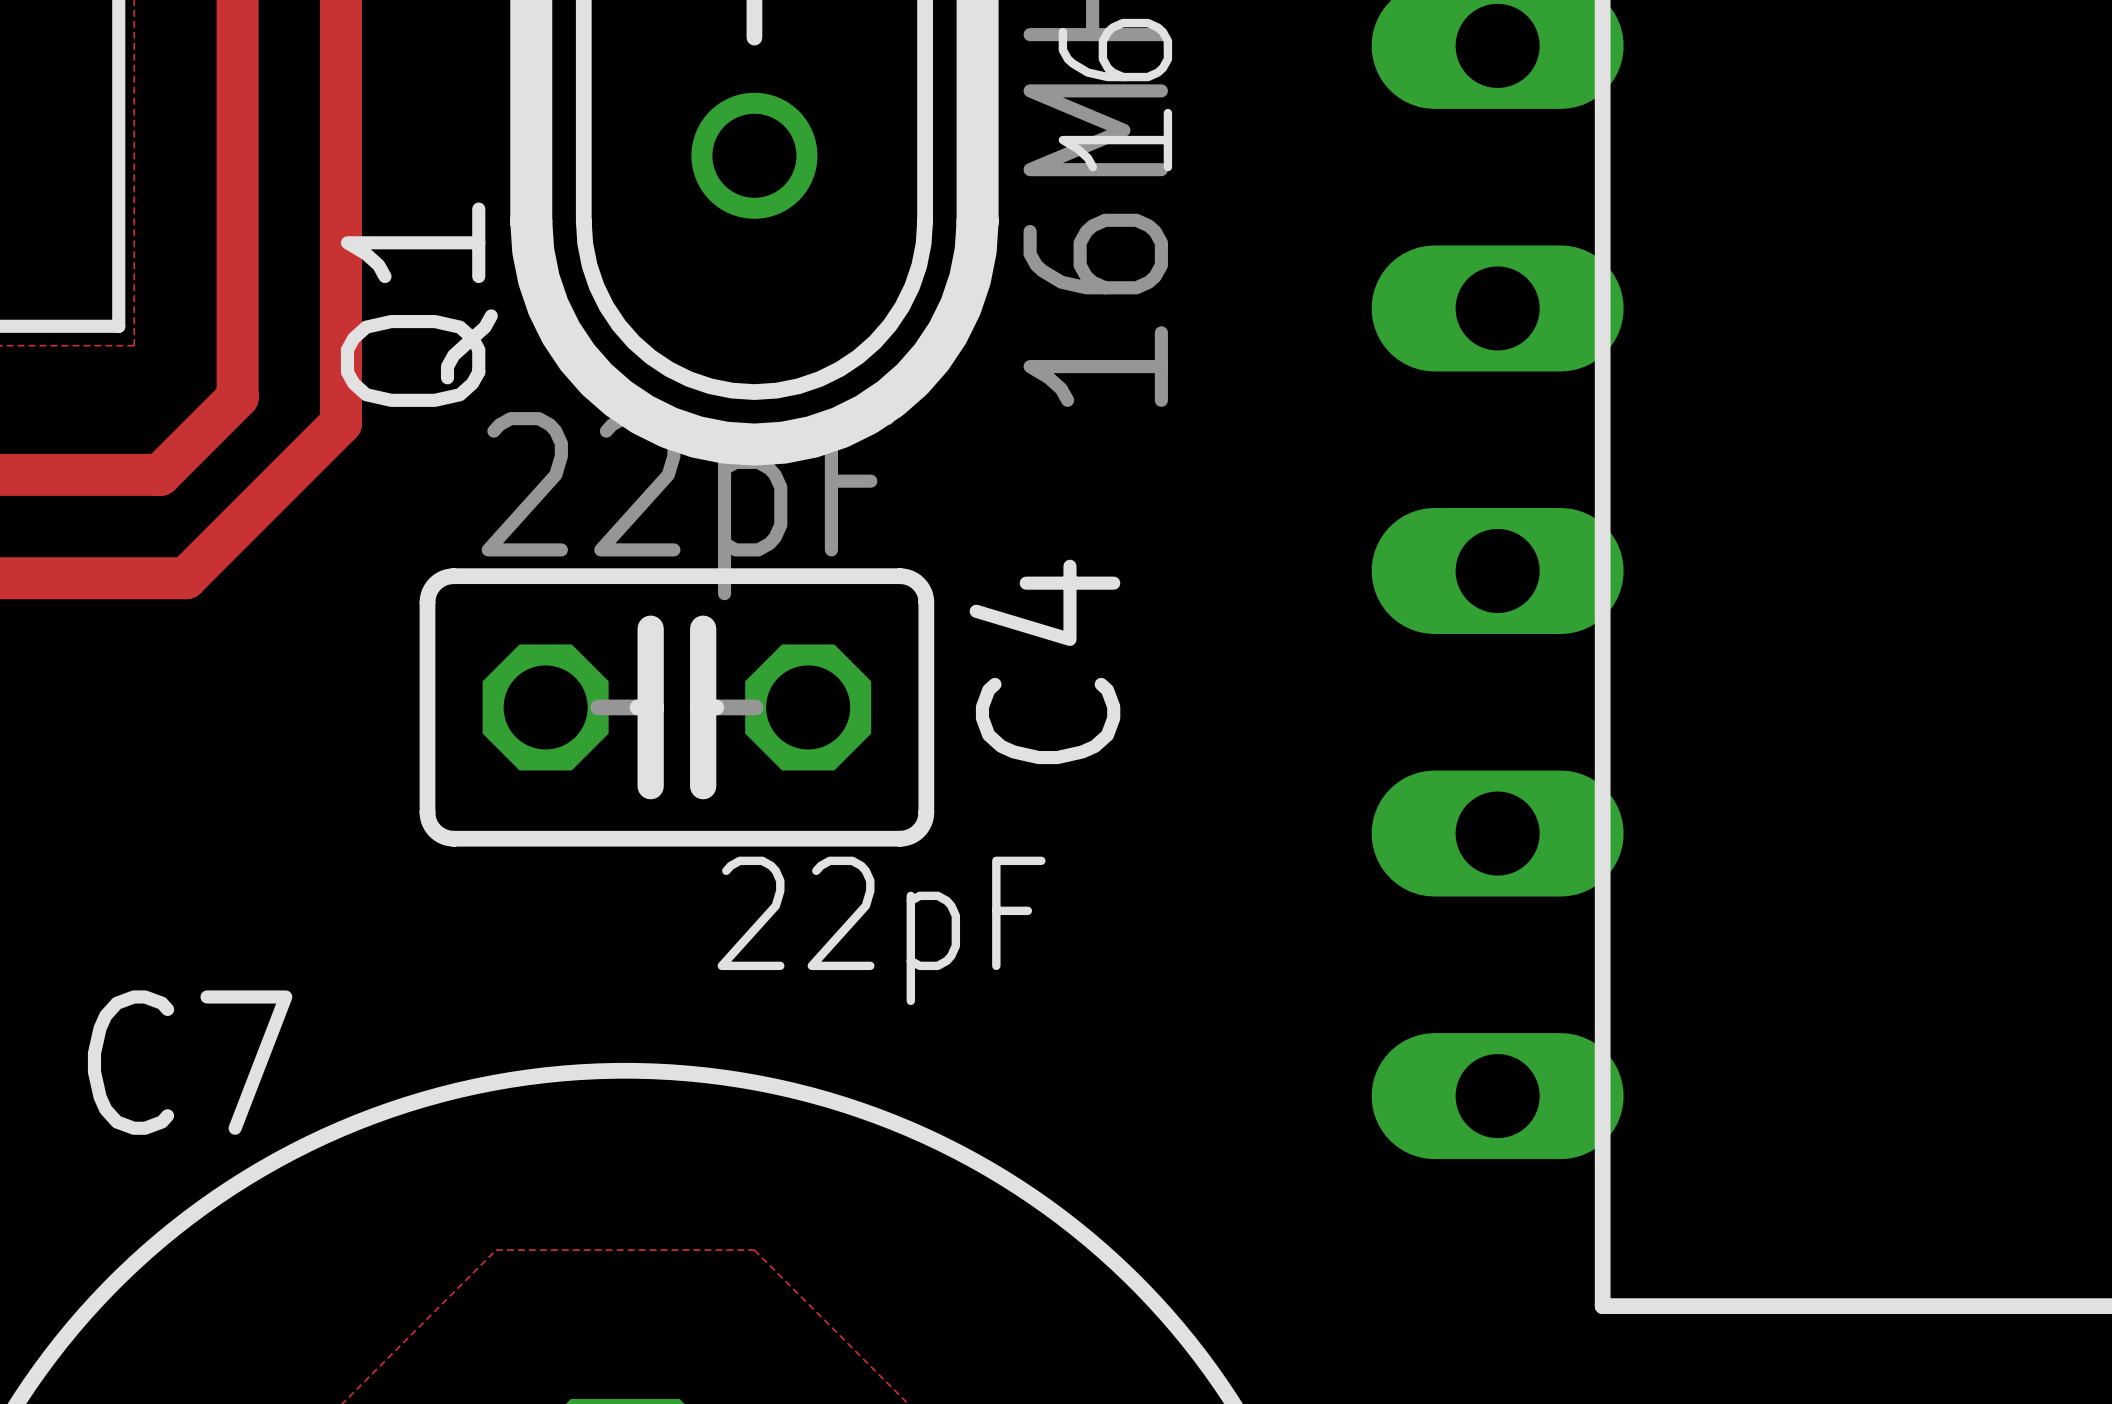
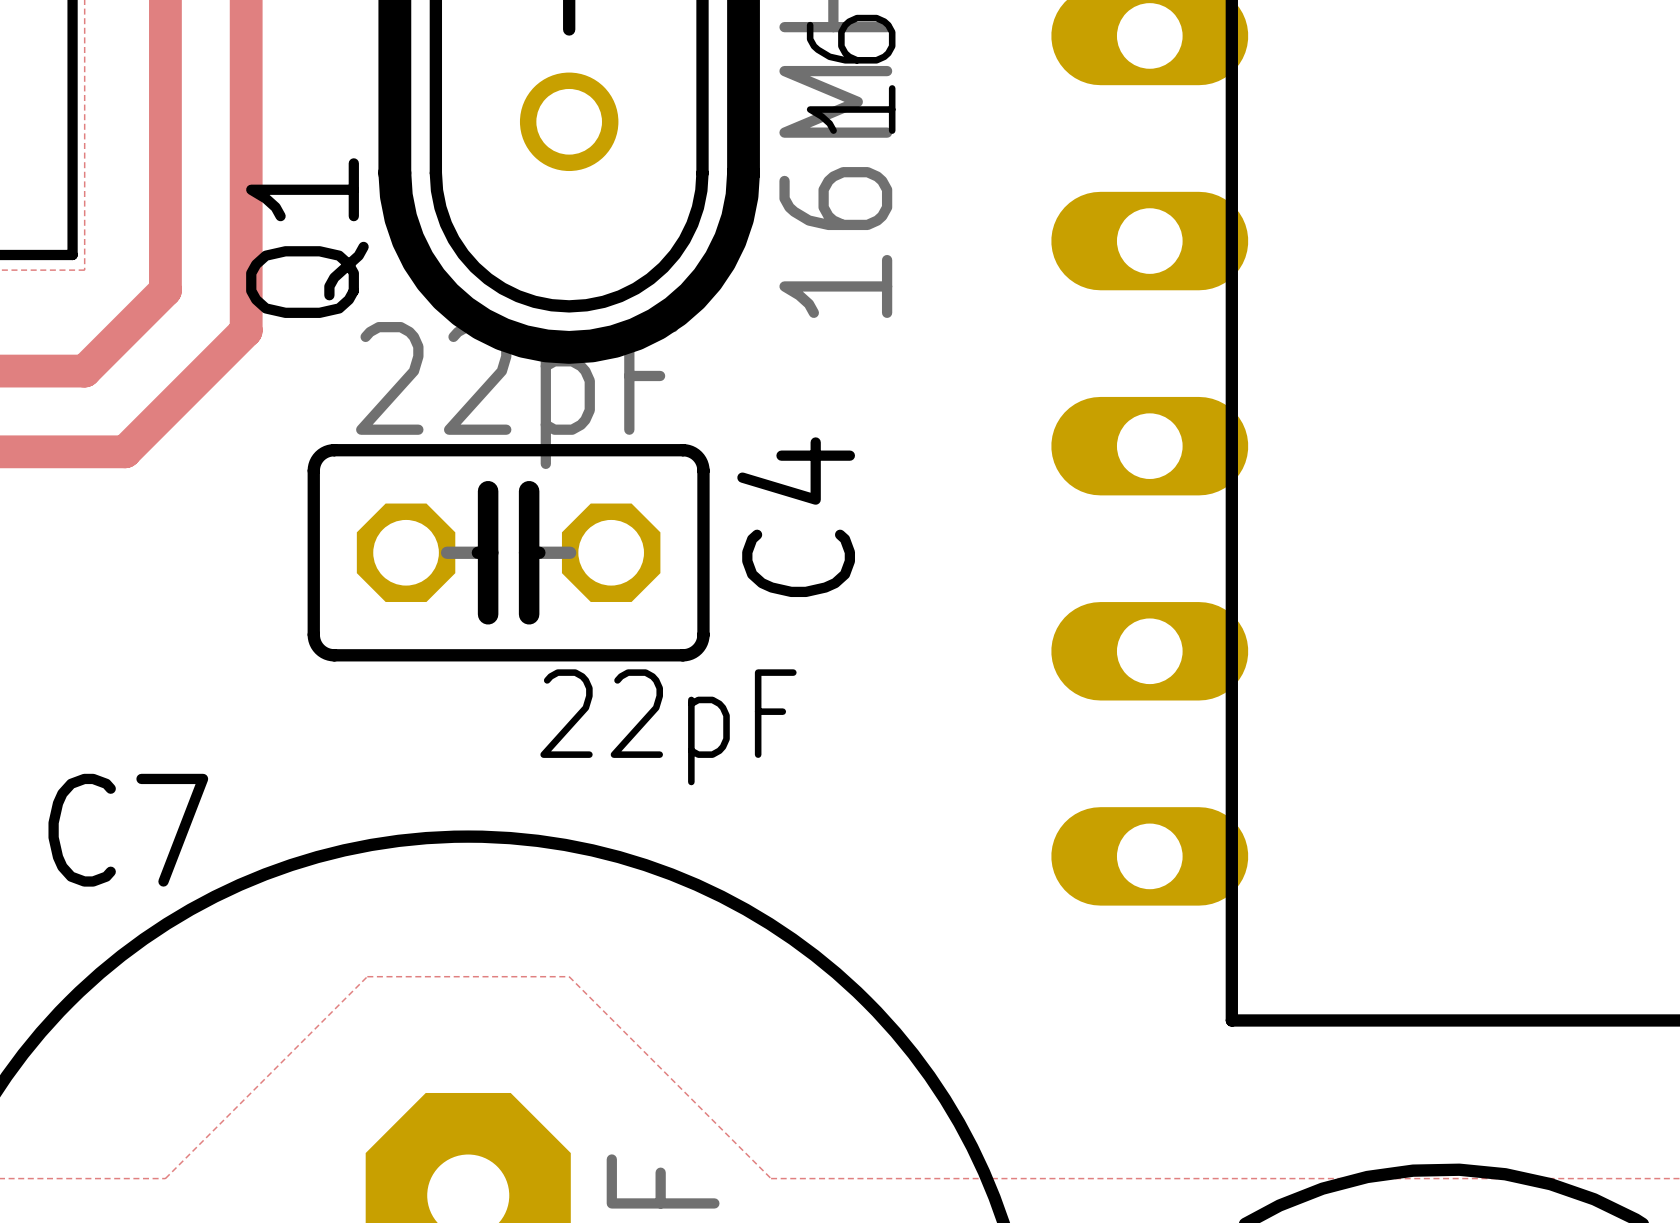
track: (237, 371) (237, 397) (160, 474) (134, 474) -> (165, 290) (84, 371)

